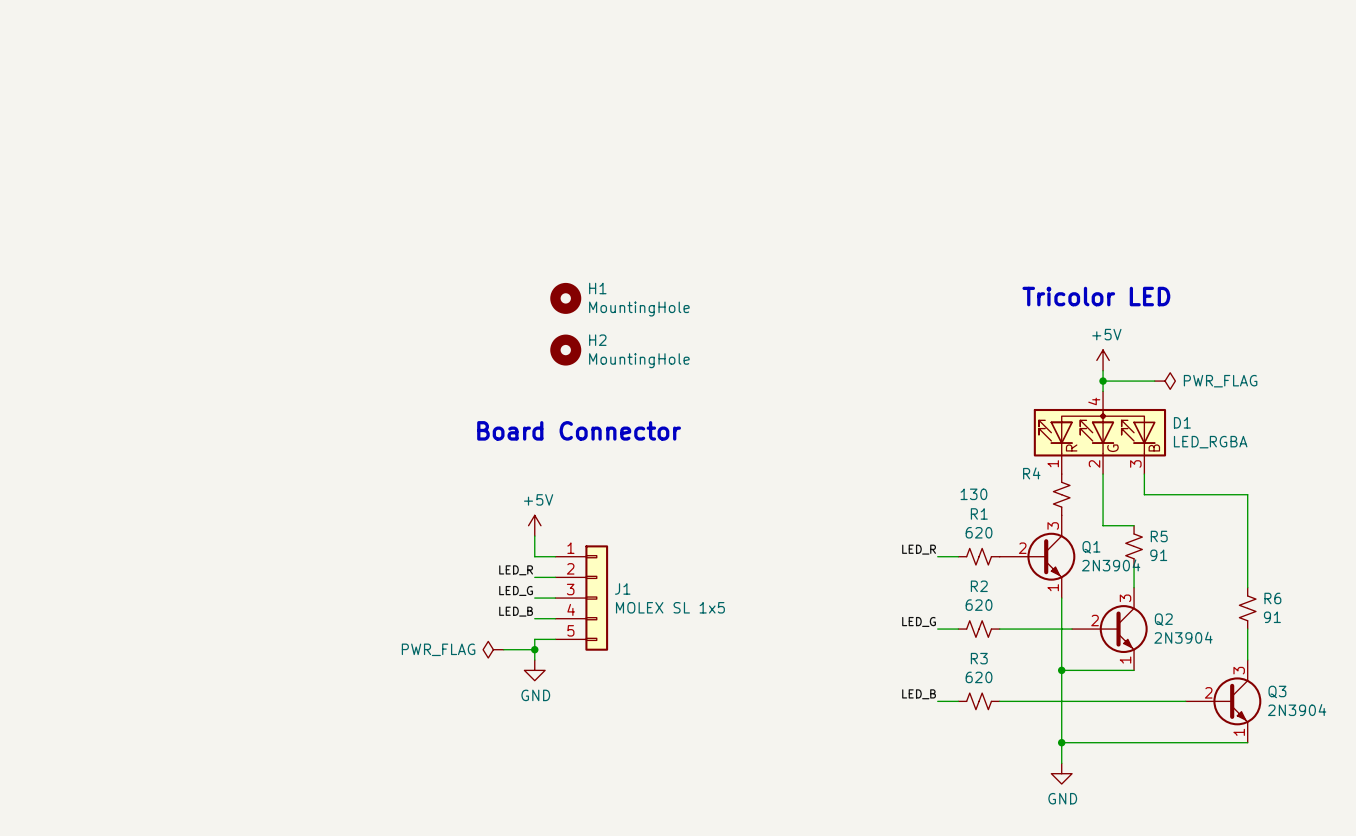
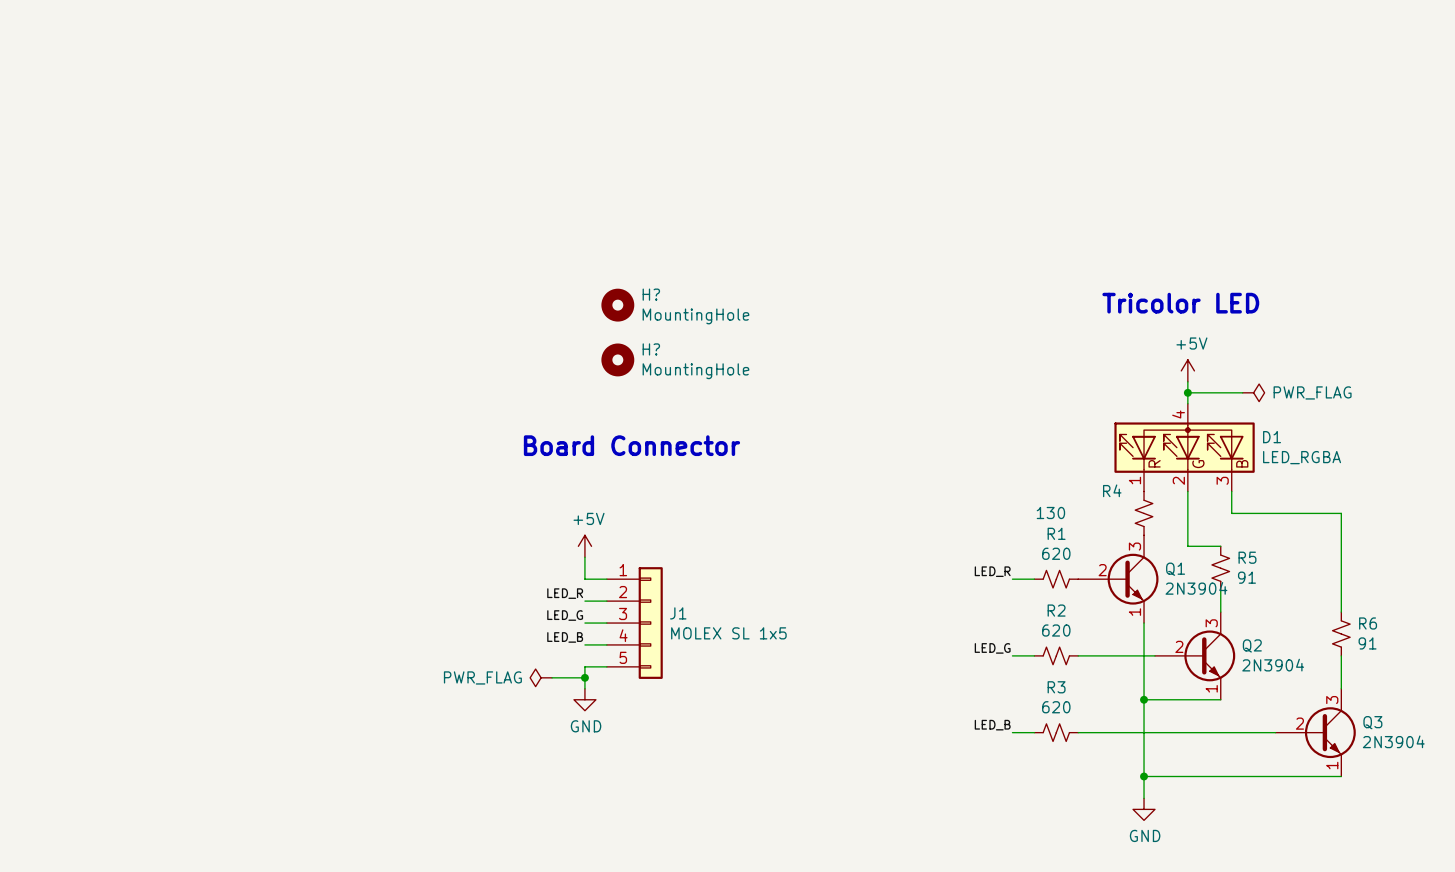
H1 name: H1 (597, 288) -> H? (651, 294)
H2 name: H2 (597, 340) -> H? (651, 349)

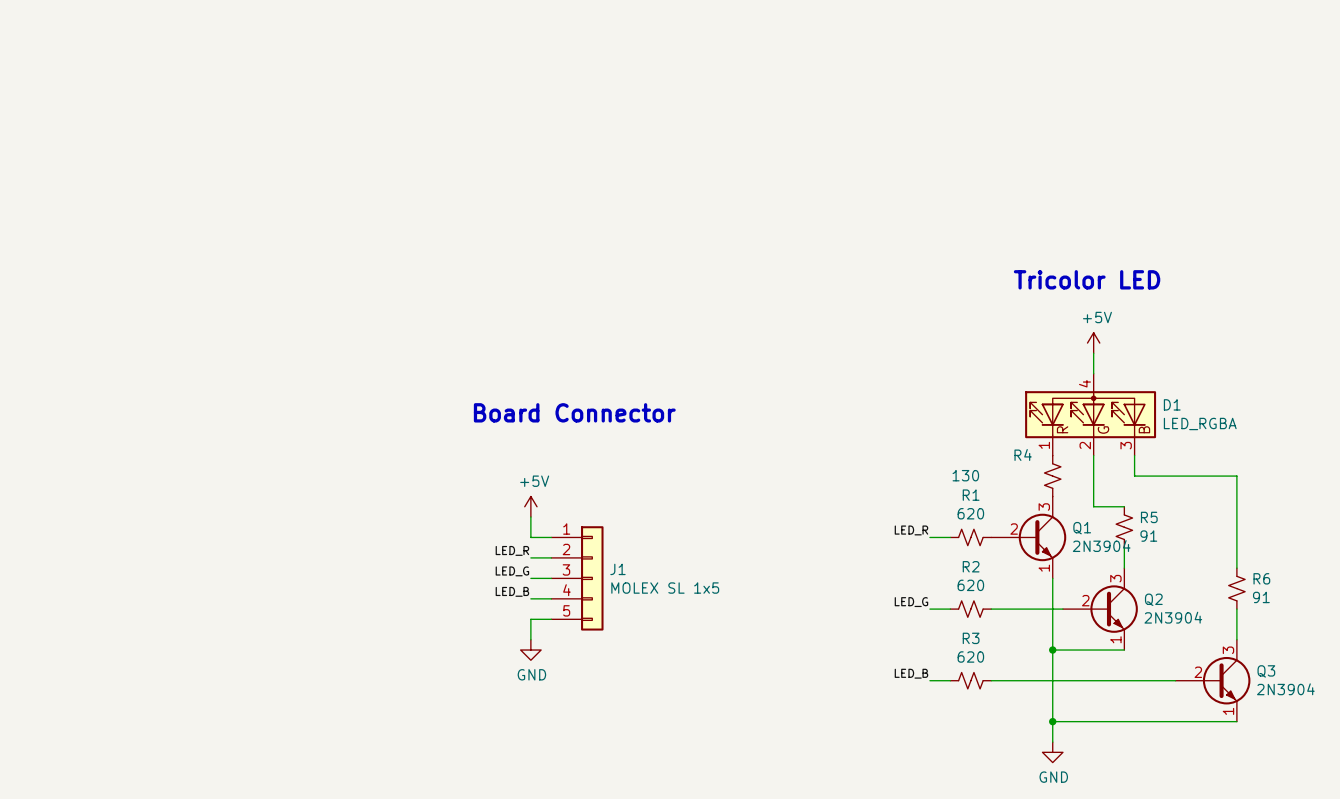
H?: MountingHole (617, 305) -> none
H?: MountingHole (617, 359) -> none
wire: (1187, 392) (1242, 392) -> none
junction: (1187, 392) -> none
power symbol: PWR_FLAG (1253, 392) -> none
power symbol: PWR_FLAG (541, 677) -> none
wire: (552, 677) (584, 677) -> none
junction: (584, 677) -> none

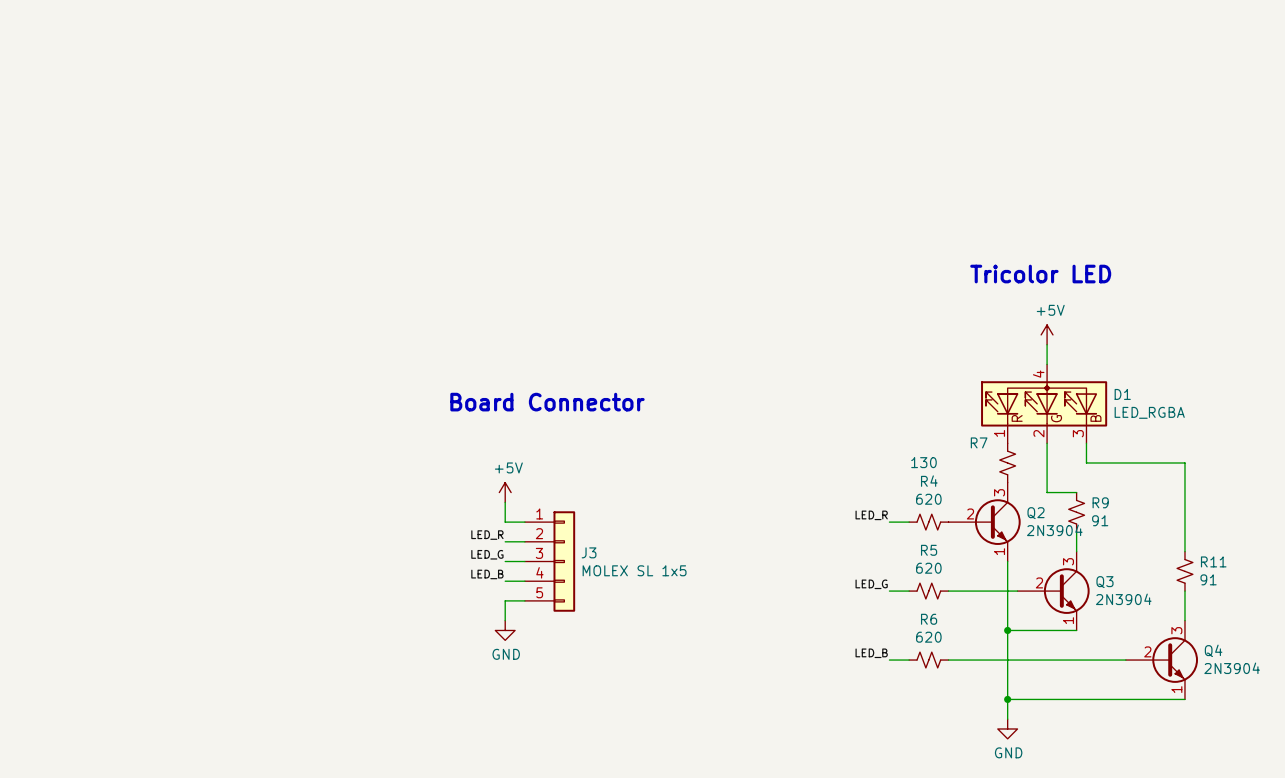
R4 name: R4 (1023, 454) -> R7 (979, 442)
R1 name: R1 (971, 495) -> R4 (929, 481)
R5 name: R5 (1149, 517) -> R9 (1100, 502)
Q1 name: Q1 (1082, 528) -> Q2 (1036, 513)
R2 name: R2 (971, 566) -> R5 (929, 550)
J1 name: J1 (617, 569) -> J3 (589, 552)
R6 name: R6 (1261, 578) -> R11 (1213, 561)
Q2 name: Q2 (1153, 599) -> Q3 (1104, 582)
R3 name: R3 (971, 638) -> R6 (929, 619)
Q3 name: Q3 (1266, 671) -> Q4 (1213, 650)

